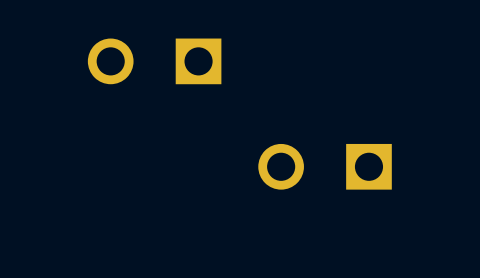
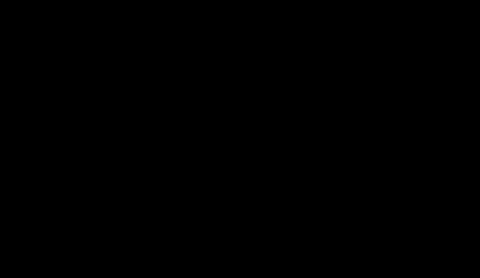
part: (154, 61) -> none
part: (325, 166) -> none

